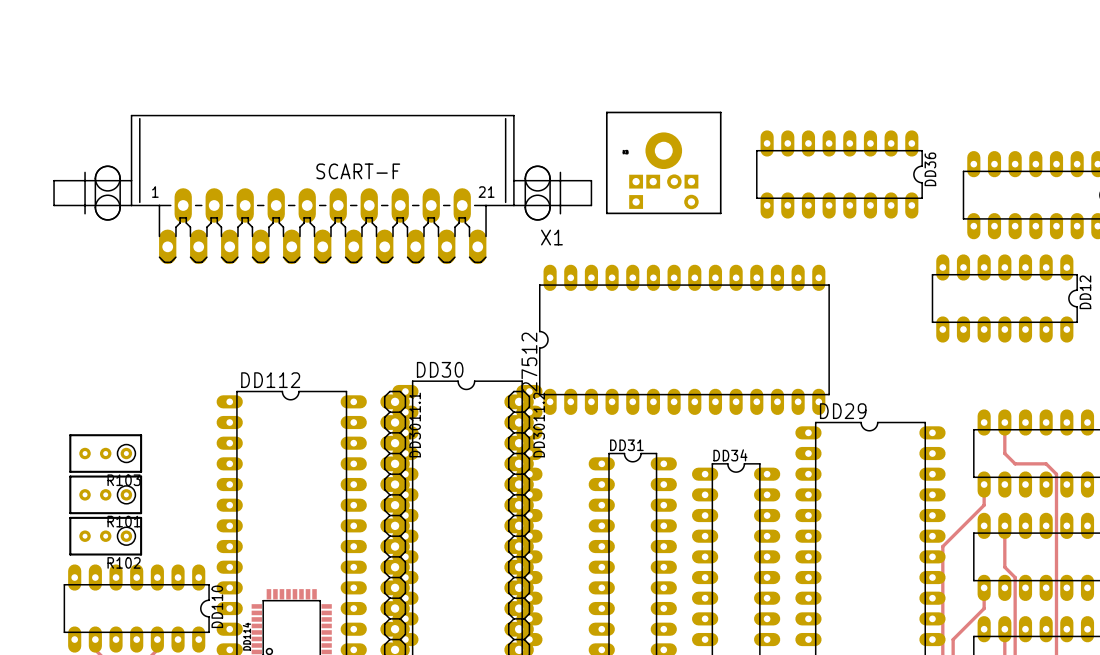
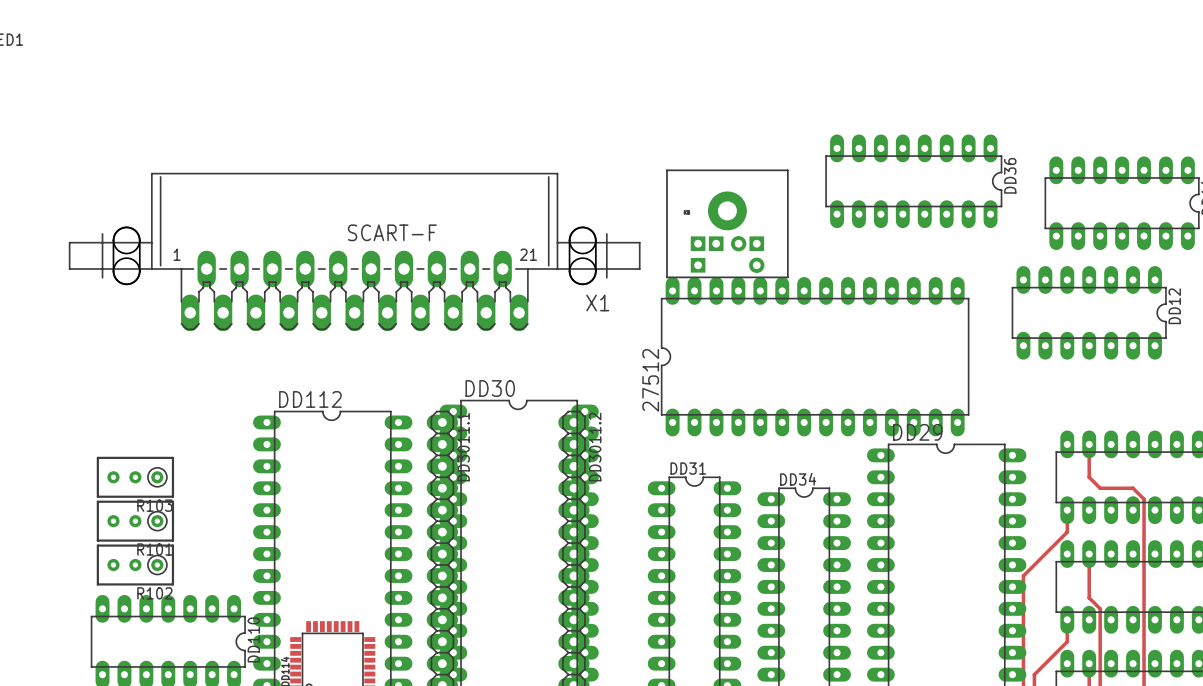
part position: (663, 162) -> (727, 223)
X1 position: (322, 189) -> (354, 252)
27512 position: (684, 339) -> (815, 356)

